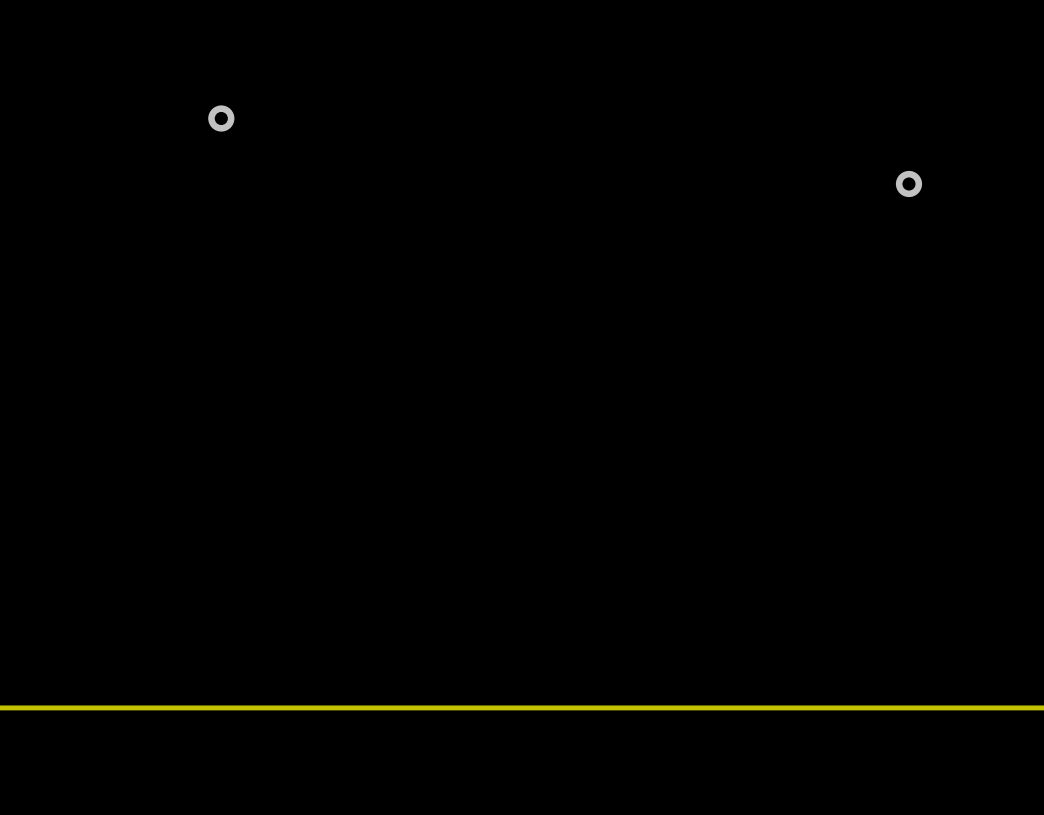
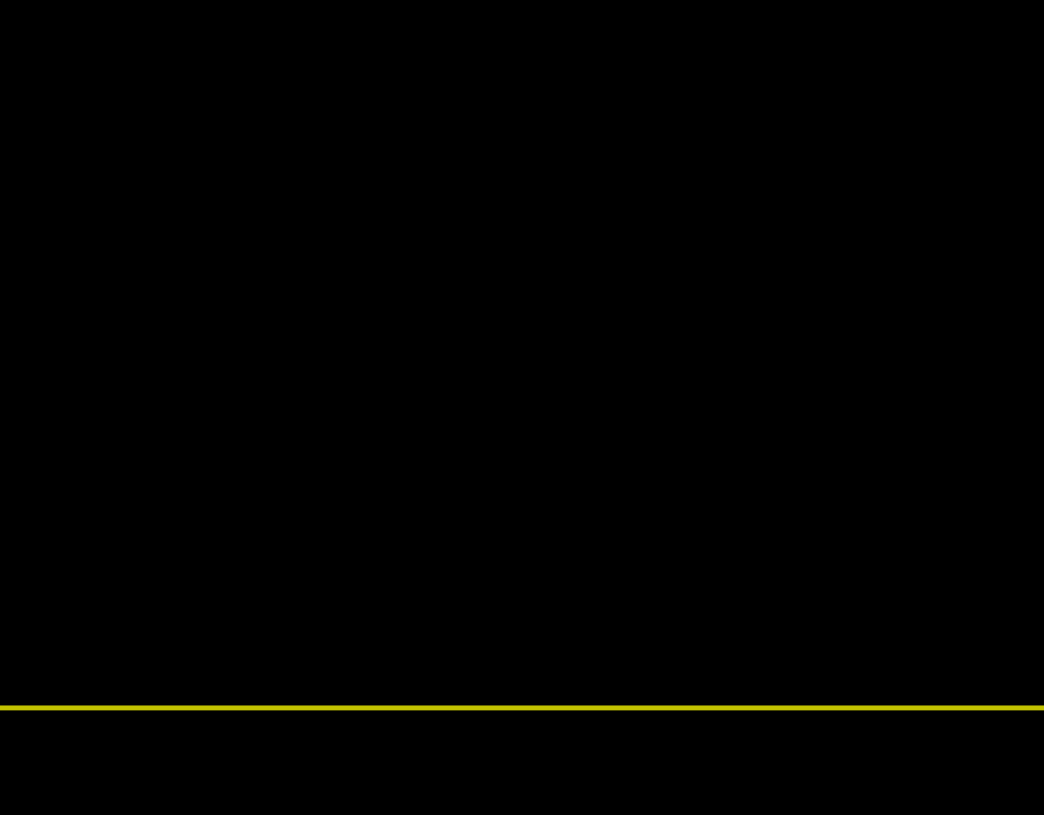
via: (221, 118) -> none
via: (908, 183) -> none

